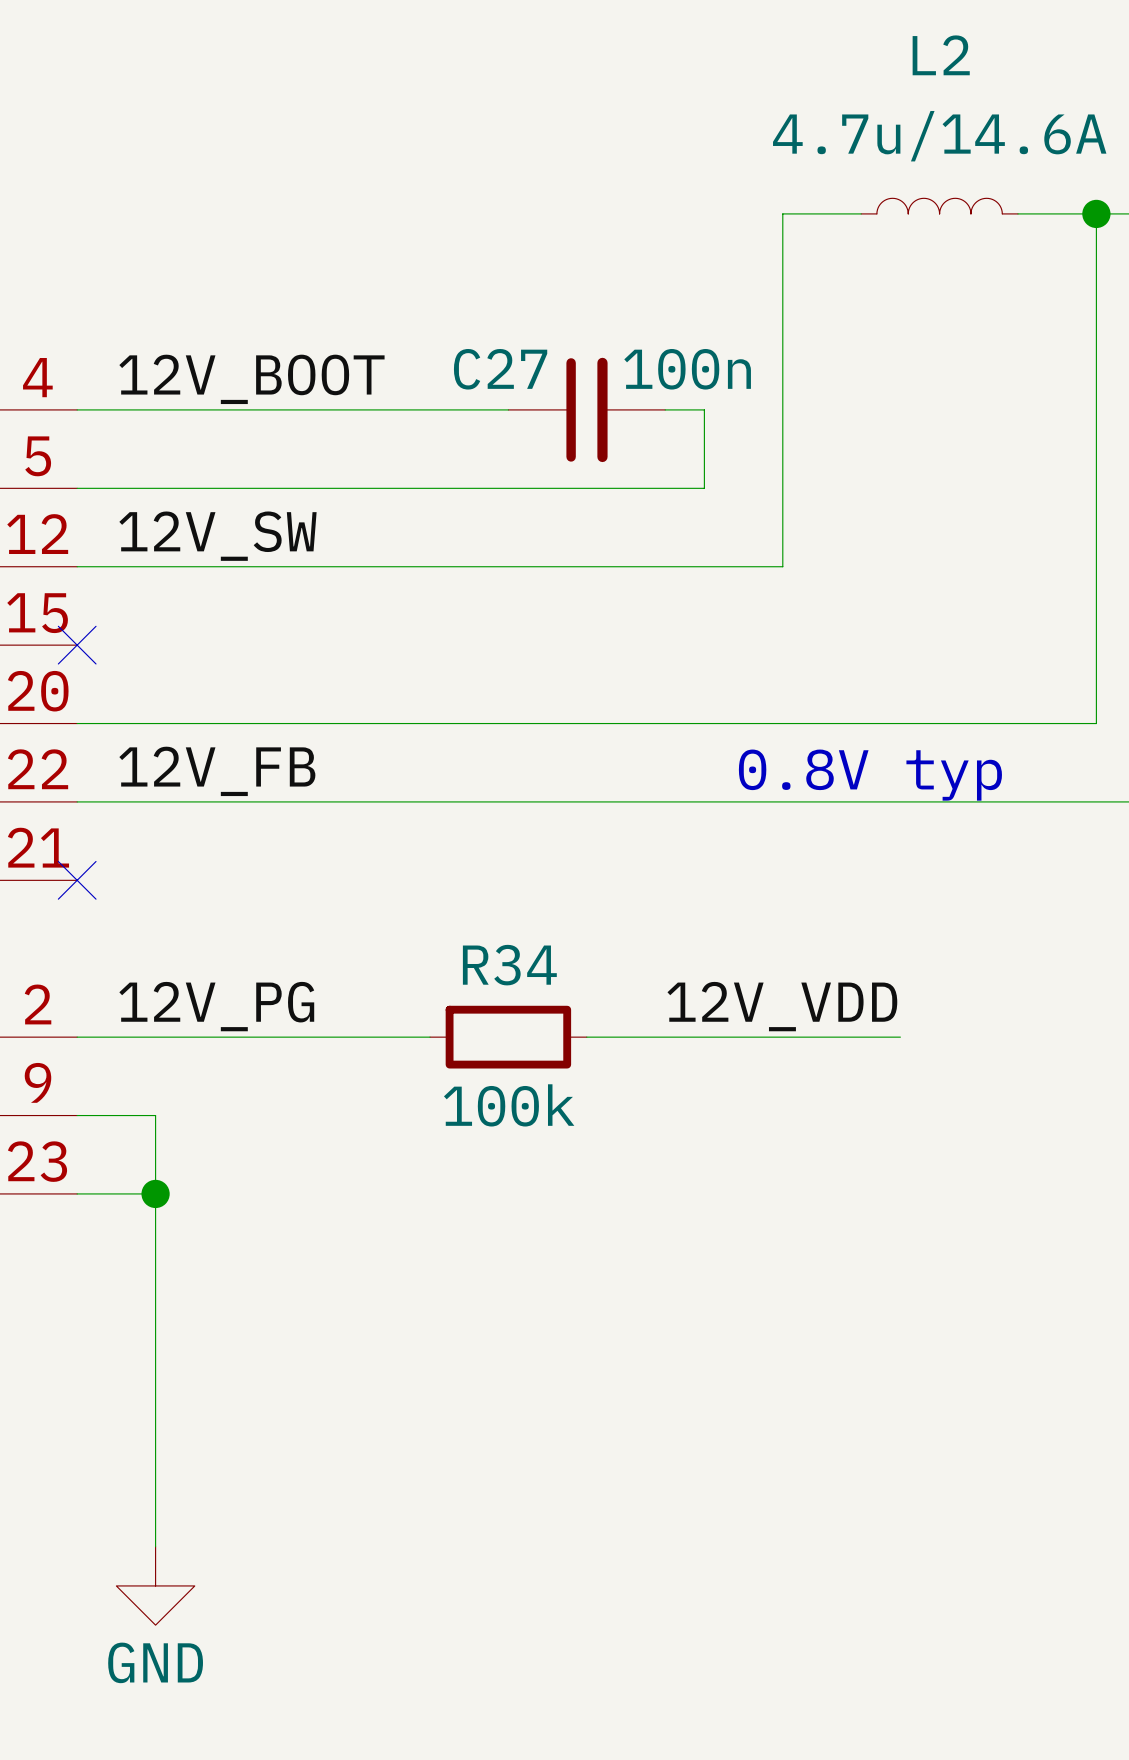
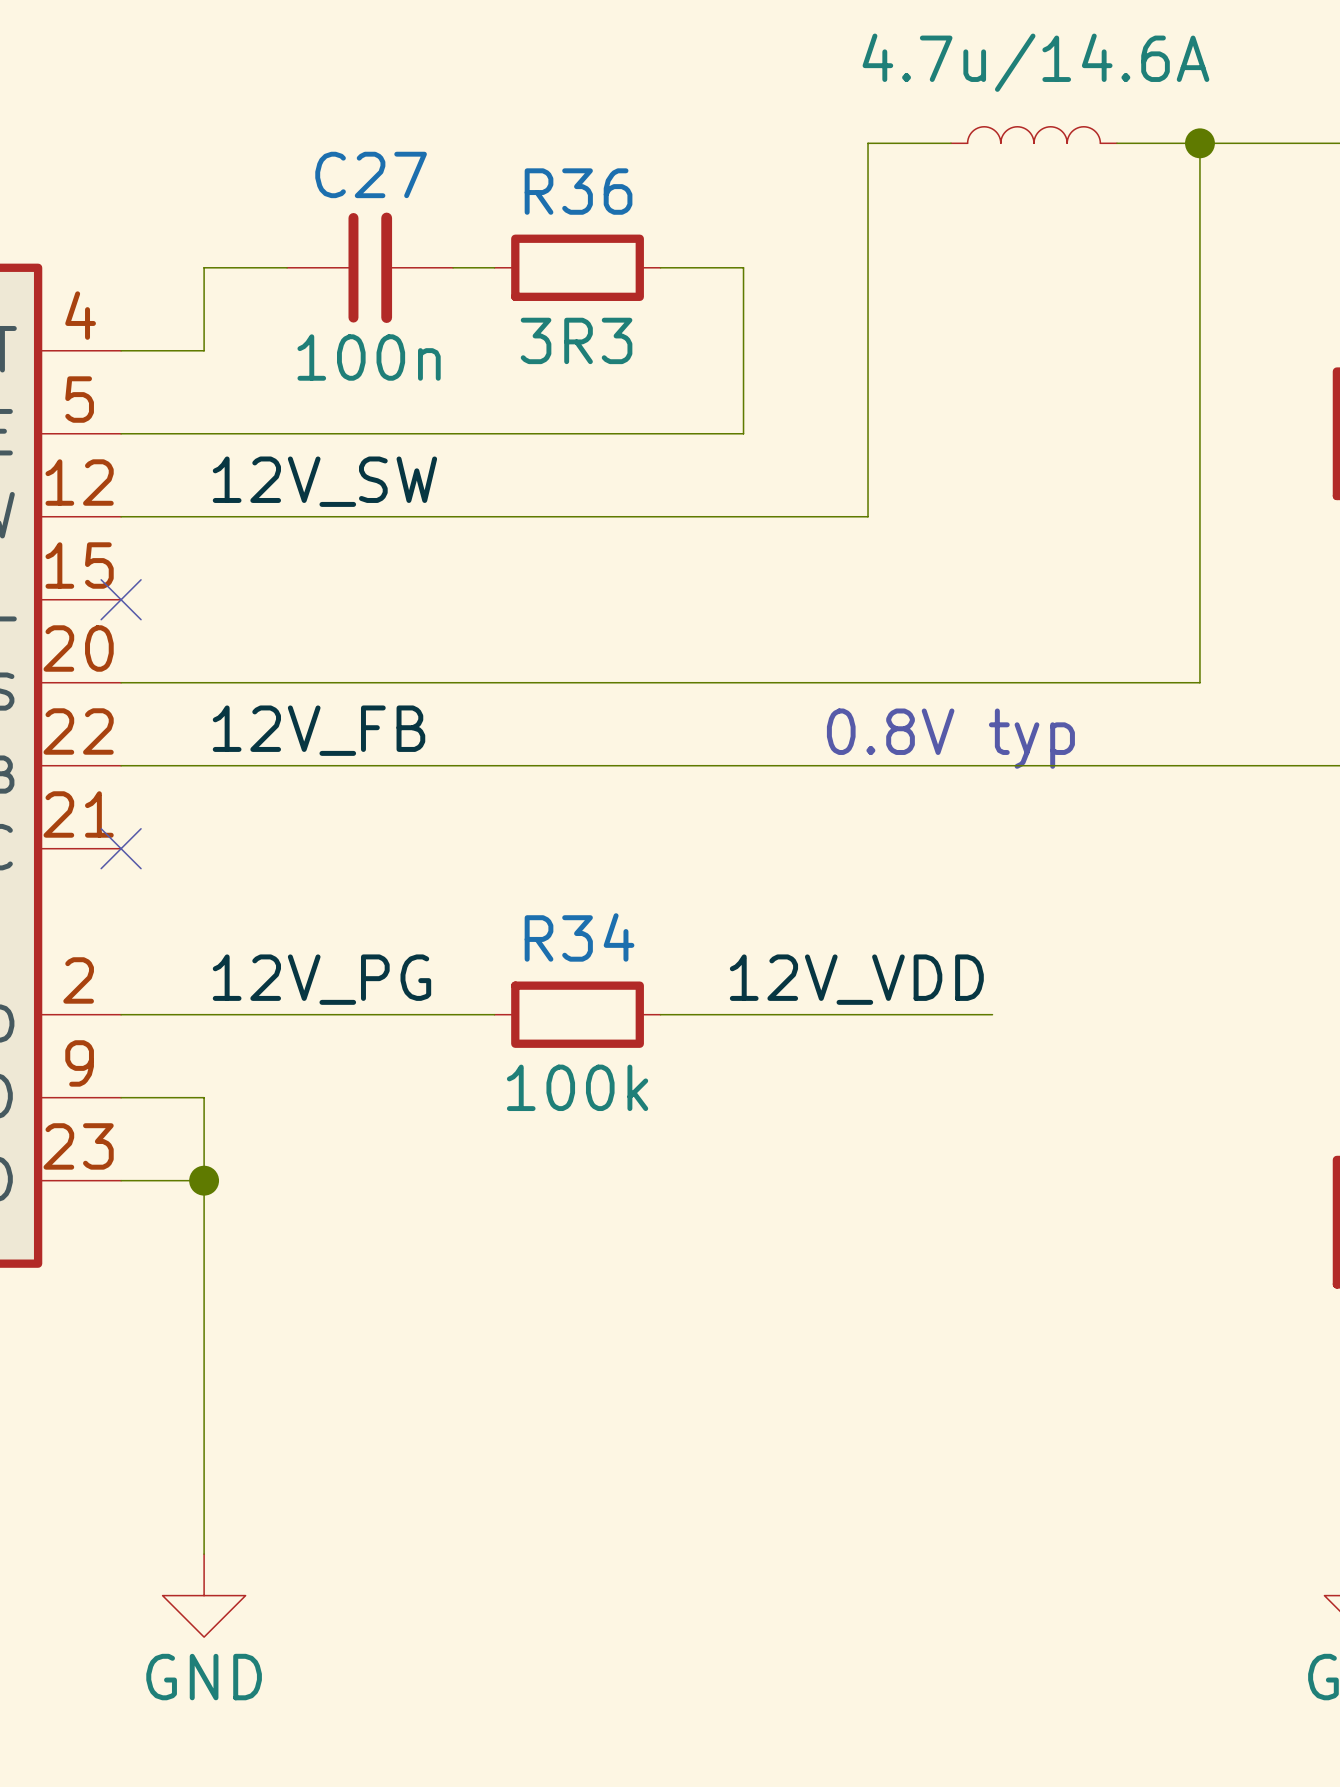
wire: none -> (453, 267) (494, 267)
R36: none -> (577, 267)
C27 name position: C27 (500, 369) -> C27 (371, 174)
C27 text position: 100n (687, 369) -> 100n (369, 357)
label: 12V_BOOT (251, 379) -> none
wire: (155, 409) (508, 409) -> (204, 350) (204, 267) (287, 267)
C27 position: (586, 409) -> (370, 267)
wire: (665, 409) (704, 409) (704, 488) (665, 488) -> (660, 267) (743, 267) (743, 433)
label position: 12V_SW (217, 536) -> 12V_SW (324, 481)
label position: 12V_FB (217, 771) -> 12V_FB (319, 730)
label position: 12V_PG (216, 1006) -> 12V_PG (321, 979)

